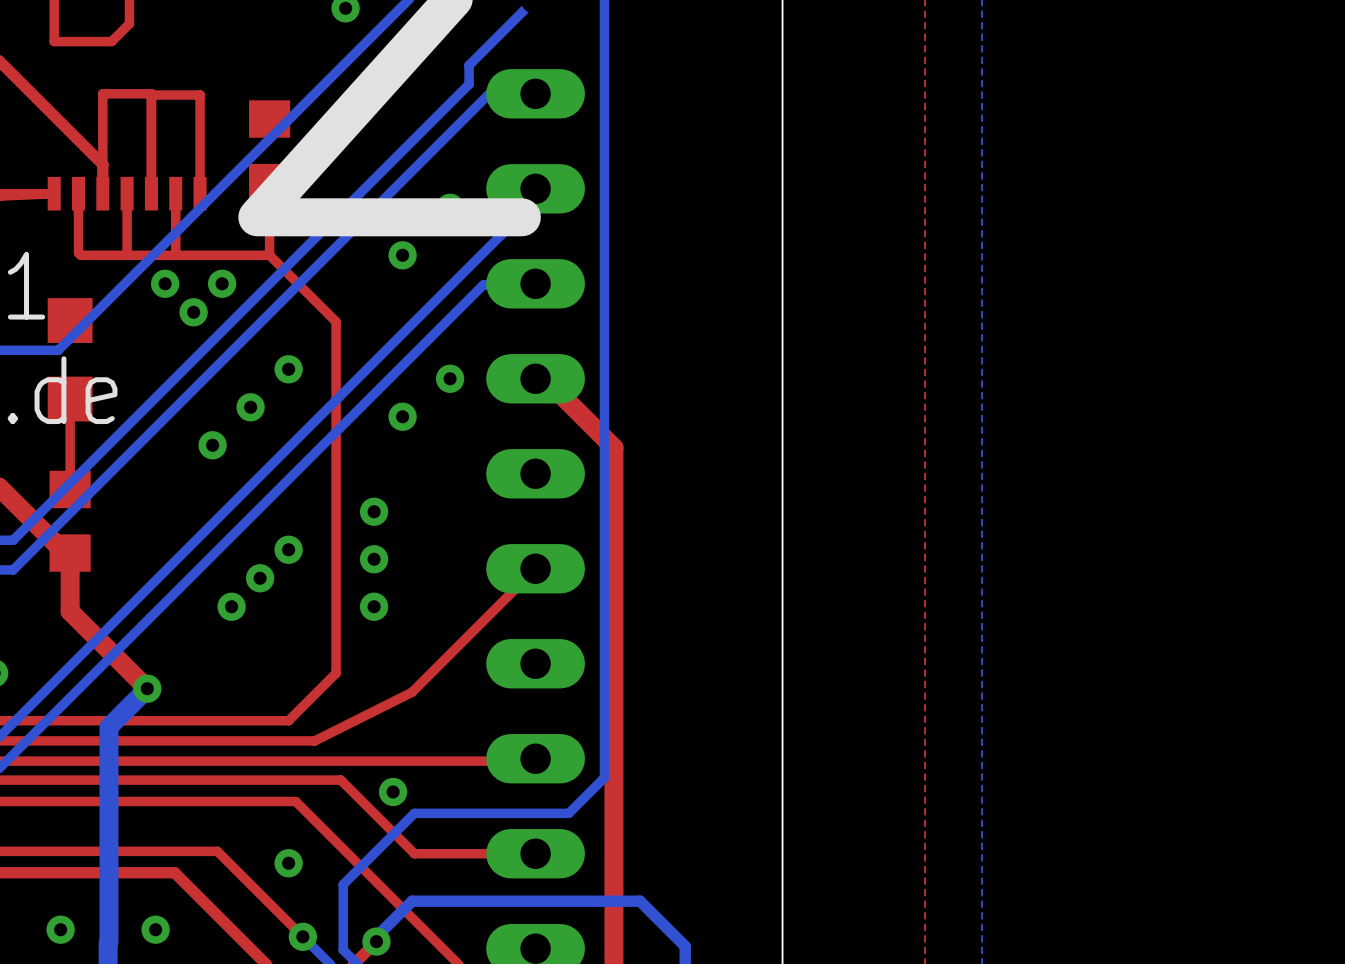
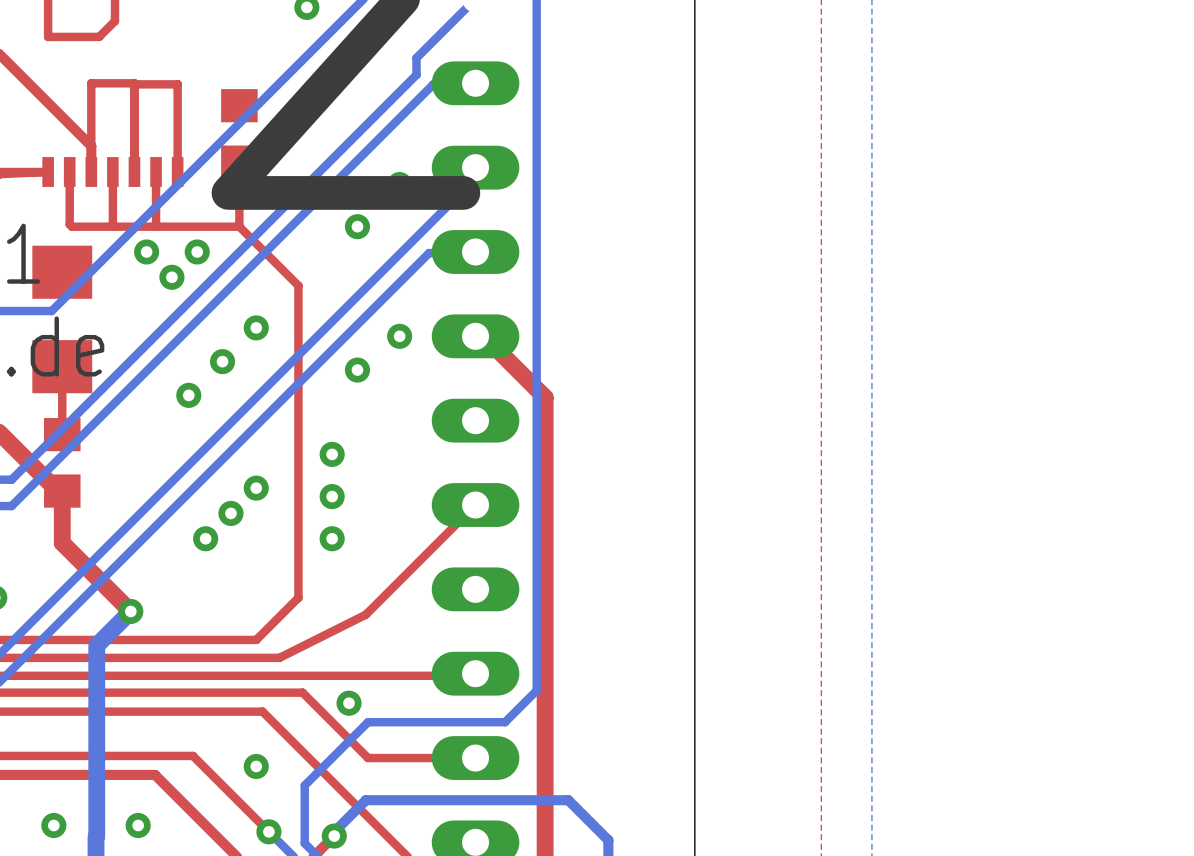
part footprint: [47, 298, 93, 422] -> [32, 245, 93, 394]

